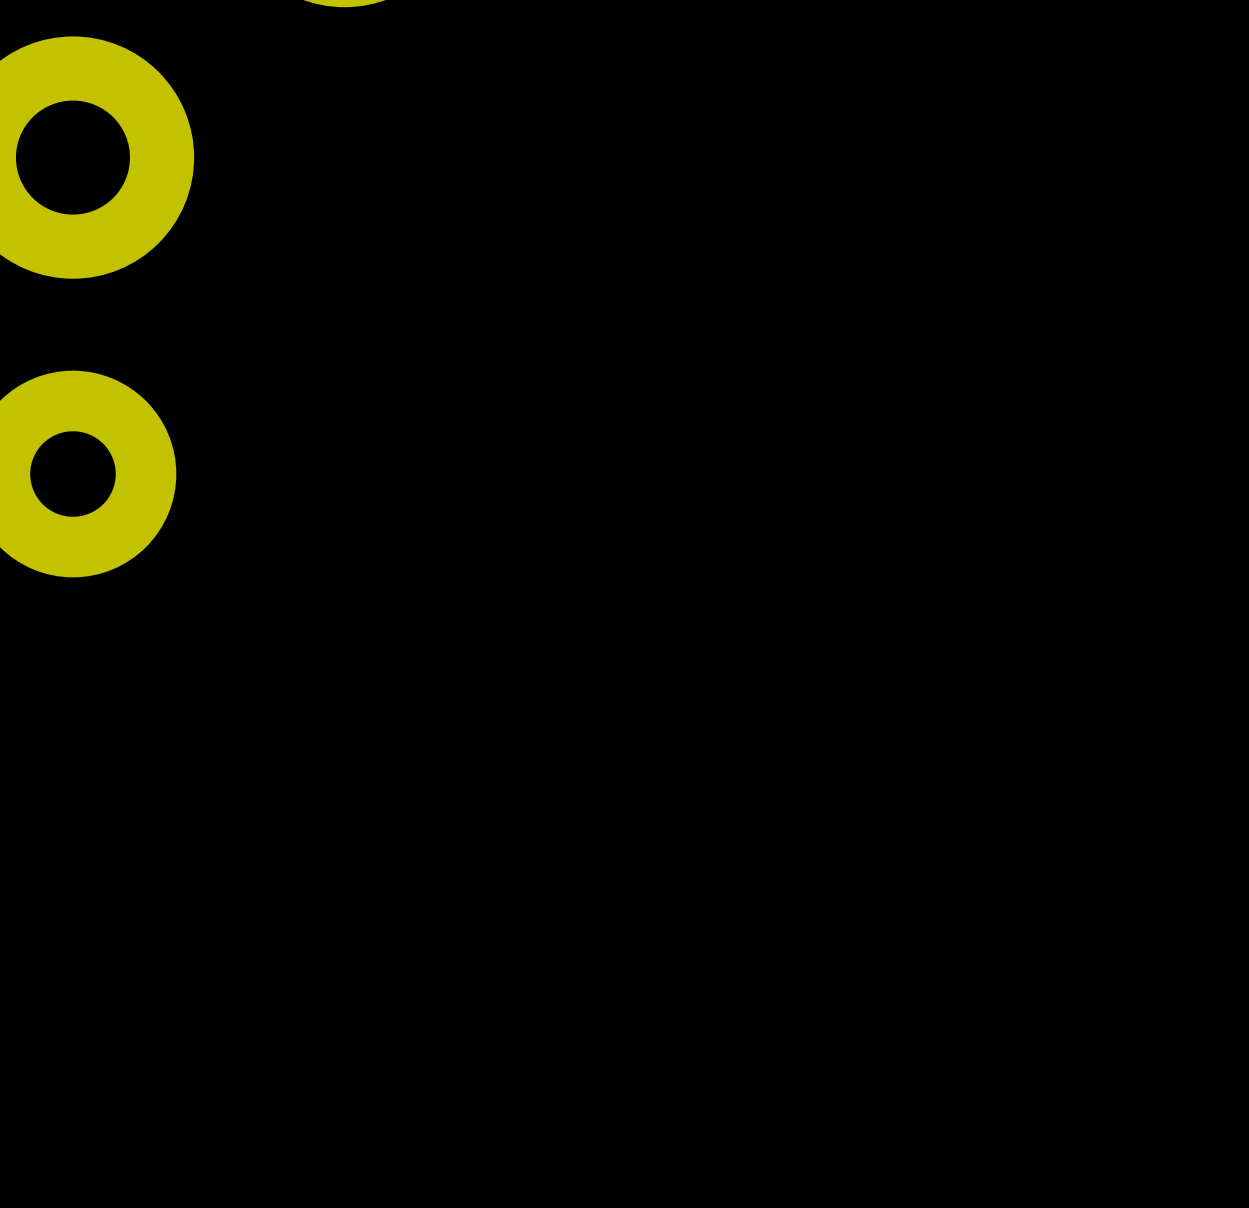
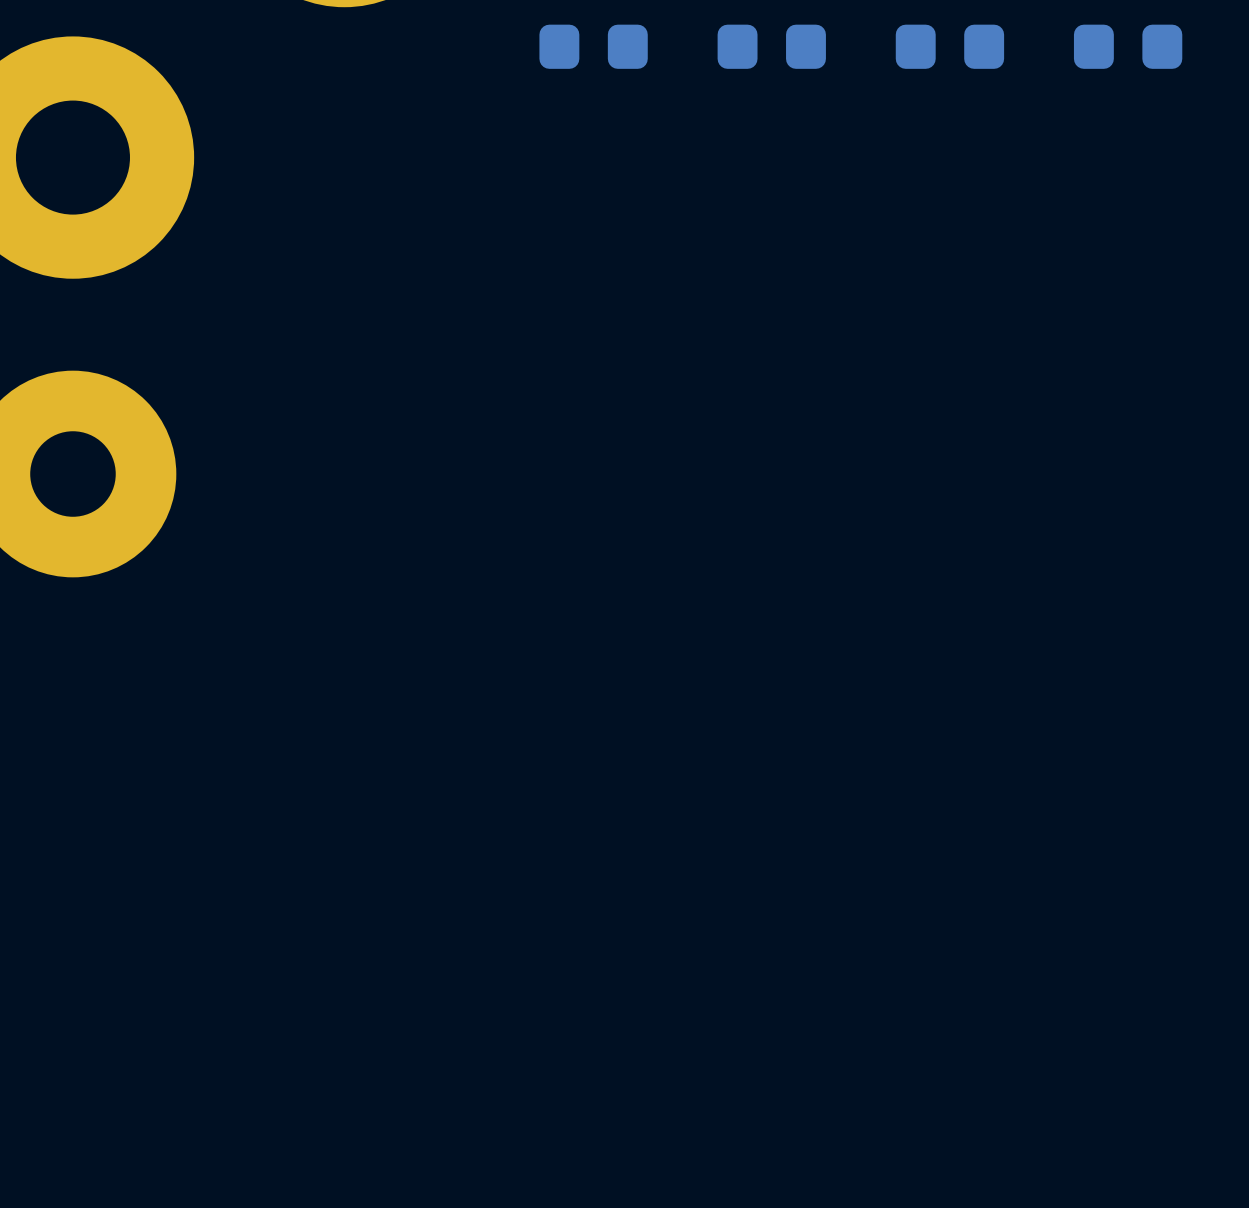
part: none -> (593, 46)
part: none -> (771, 46)
part: none -> (949, 46)
part: none -> (1128, 46)

